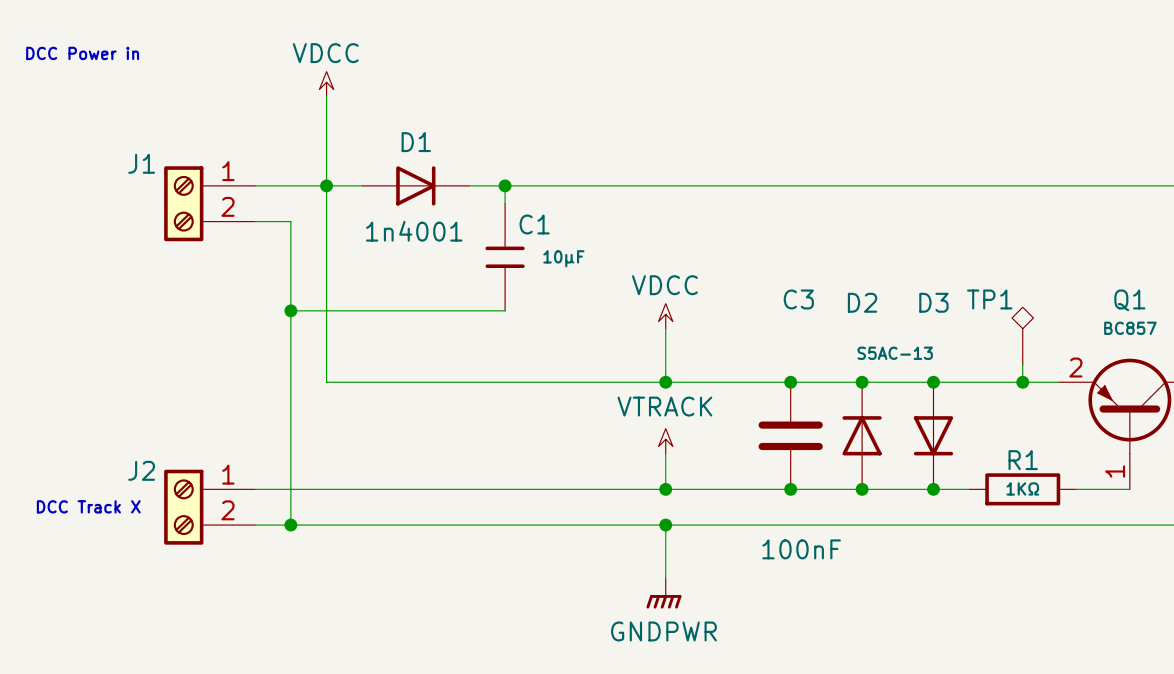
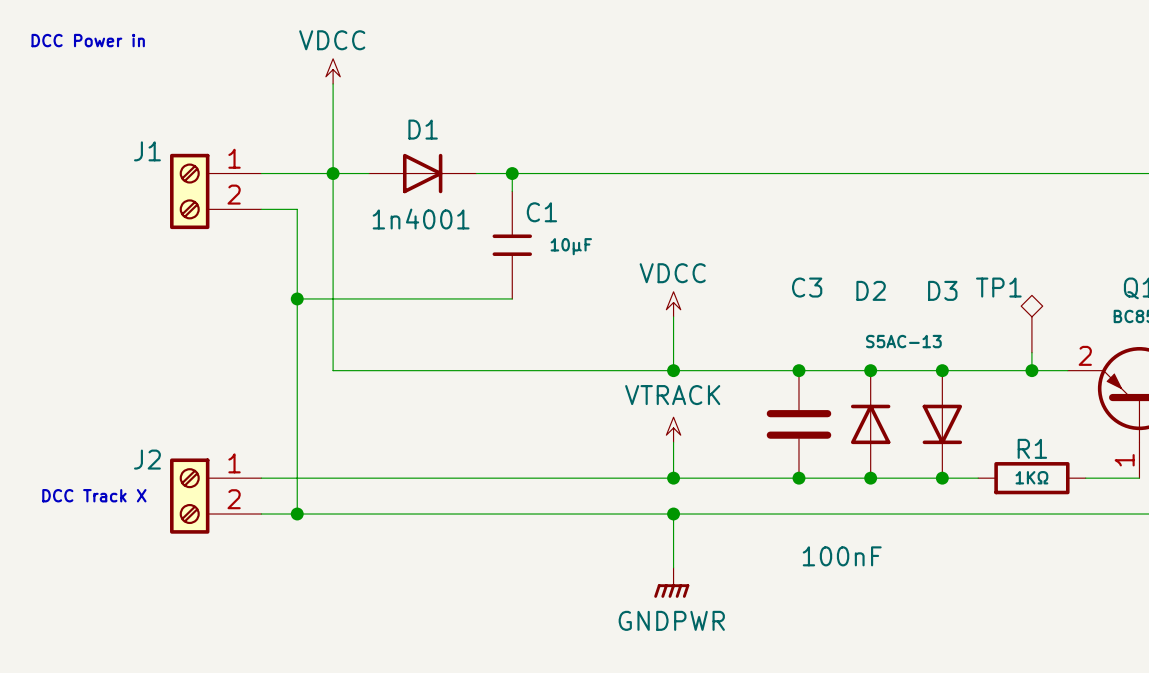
C3 value position: 100nF (801, 549) -> 100nF (842, 556)

